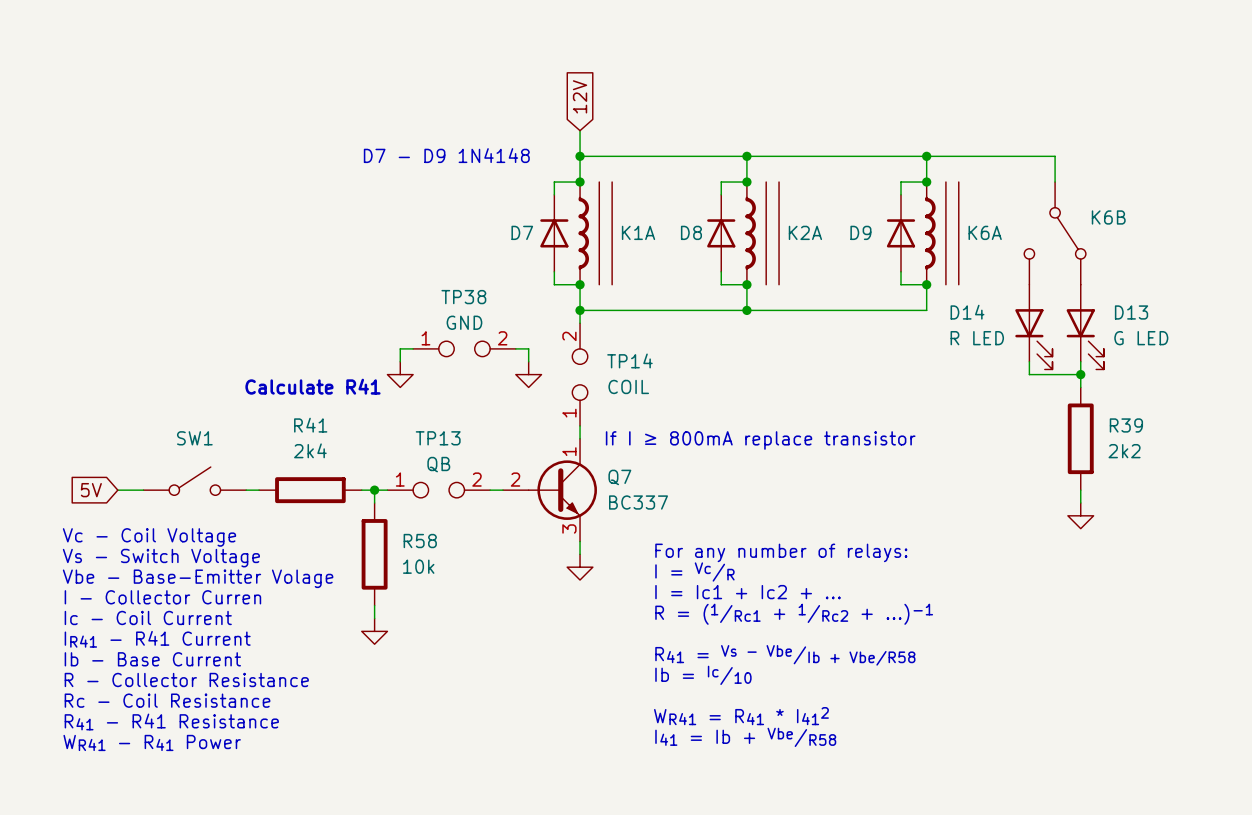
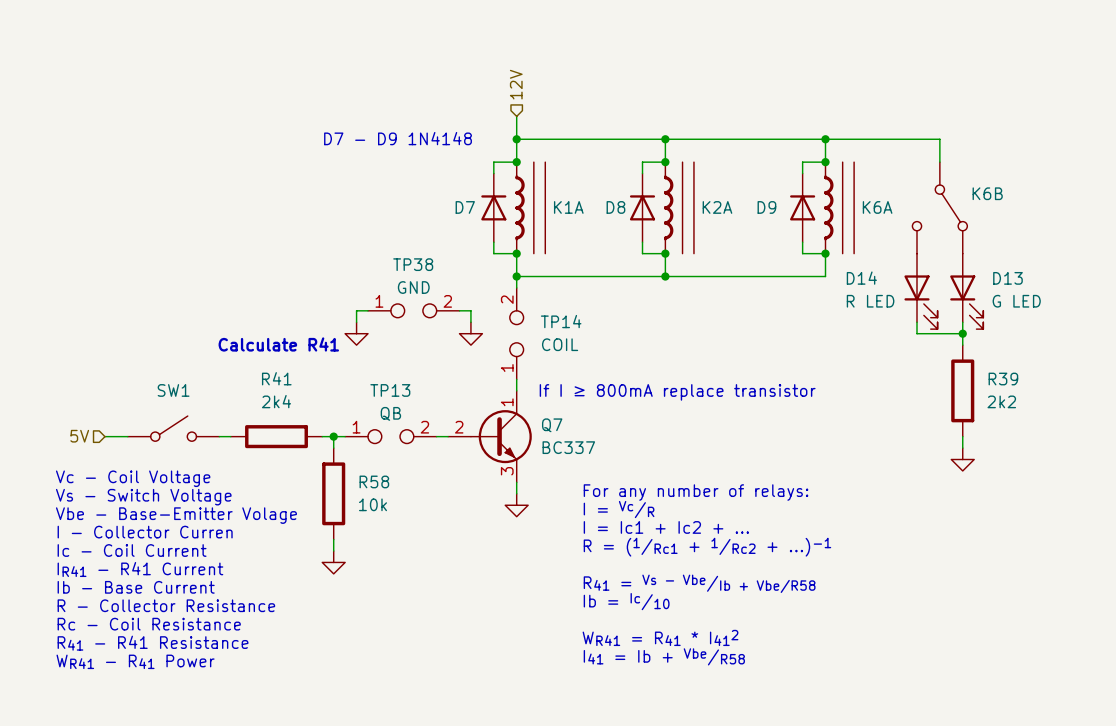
hierarchical label: none -> 12V (516, 84)
global label: 12V (580, 96) -> none
hierarchical label: none -> 5V (79, 436)
global label: 5V (91, 490) -> none

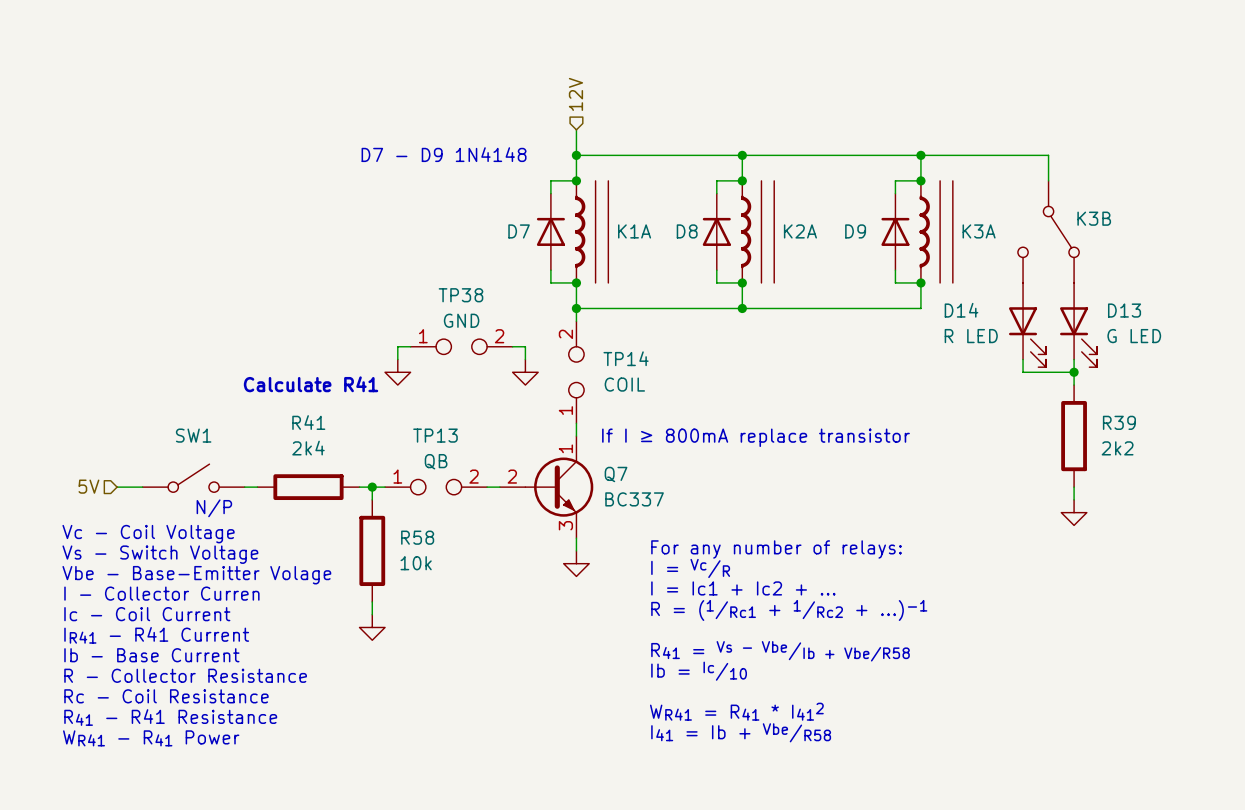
K6B name: K6B (987, 193) -> K3B (1094, 218)
K6A name: K6A (877, 207) -> K3A (979, 231)
text: none -> N/P (214, 508)

